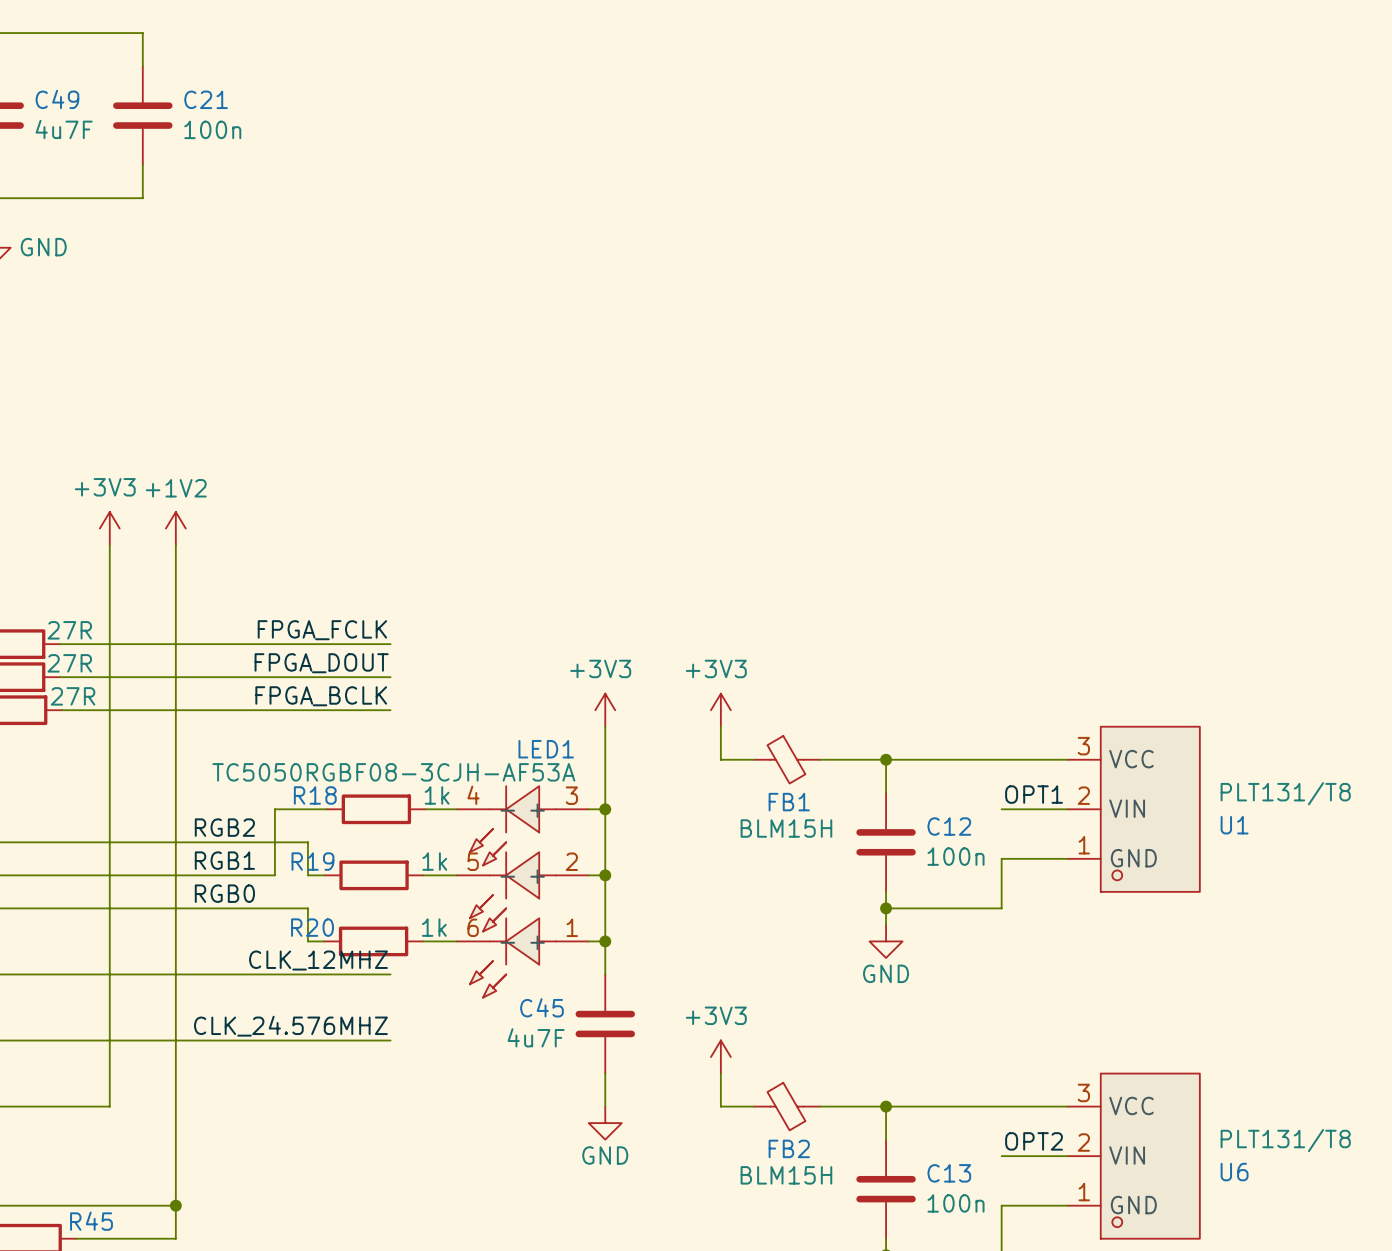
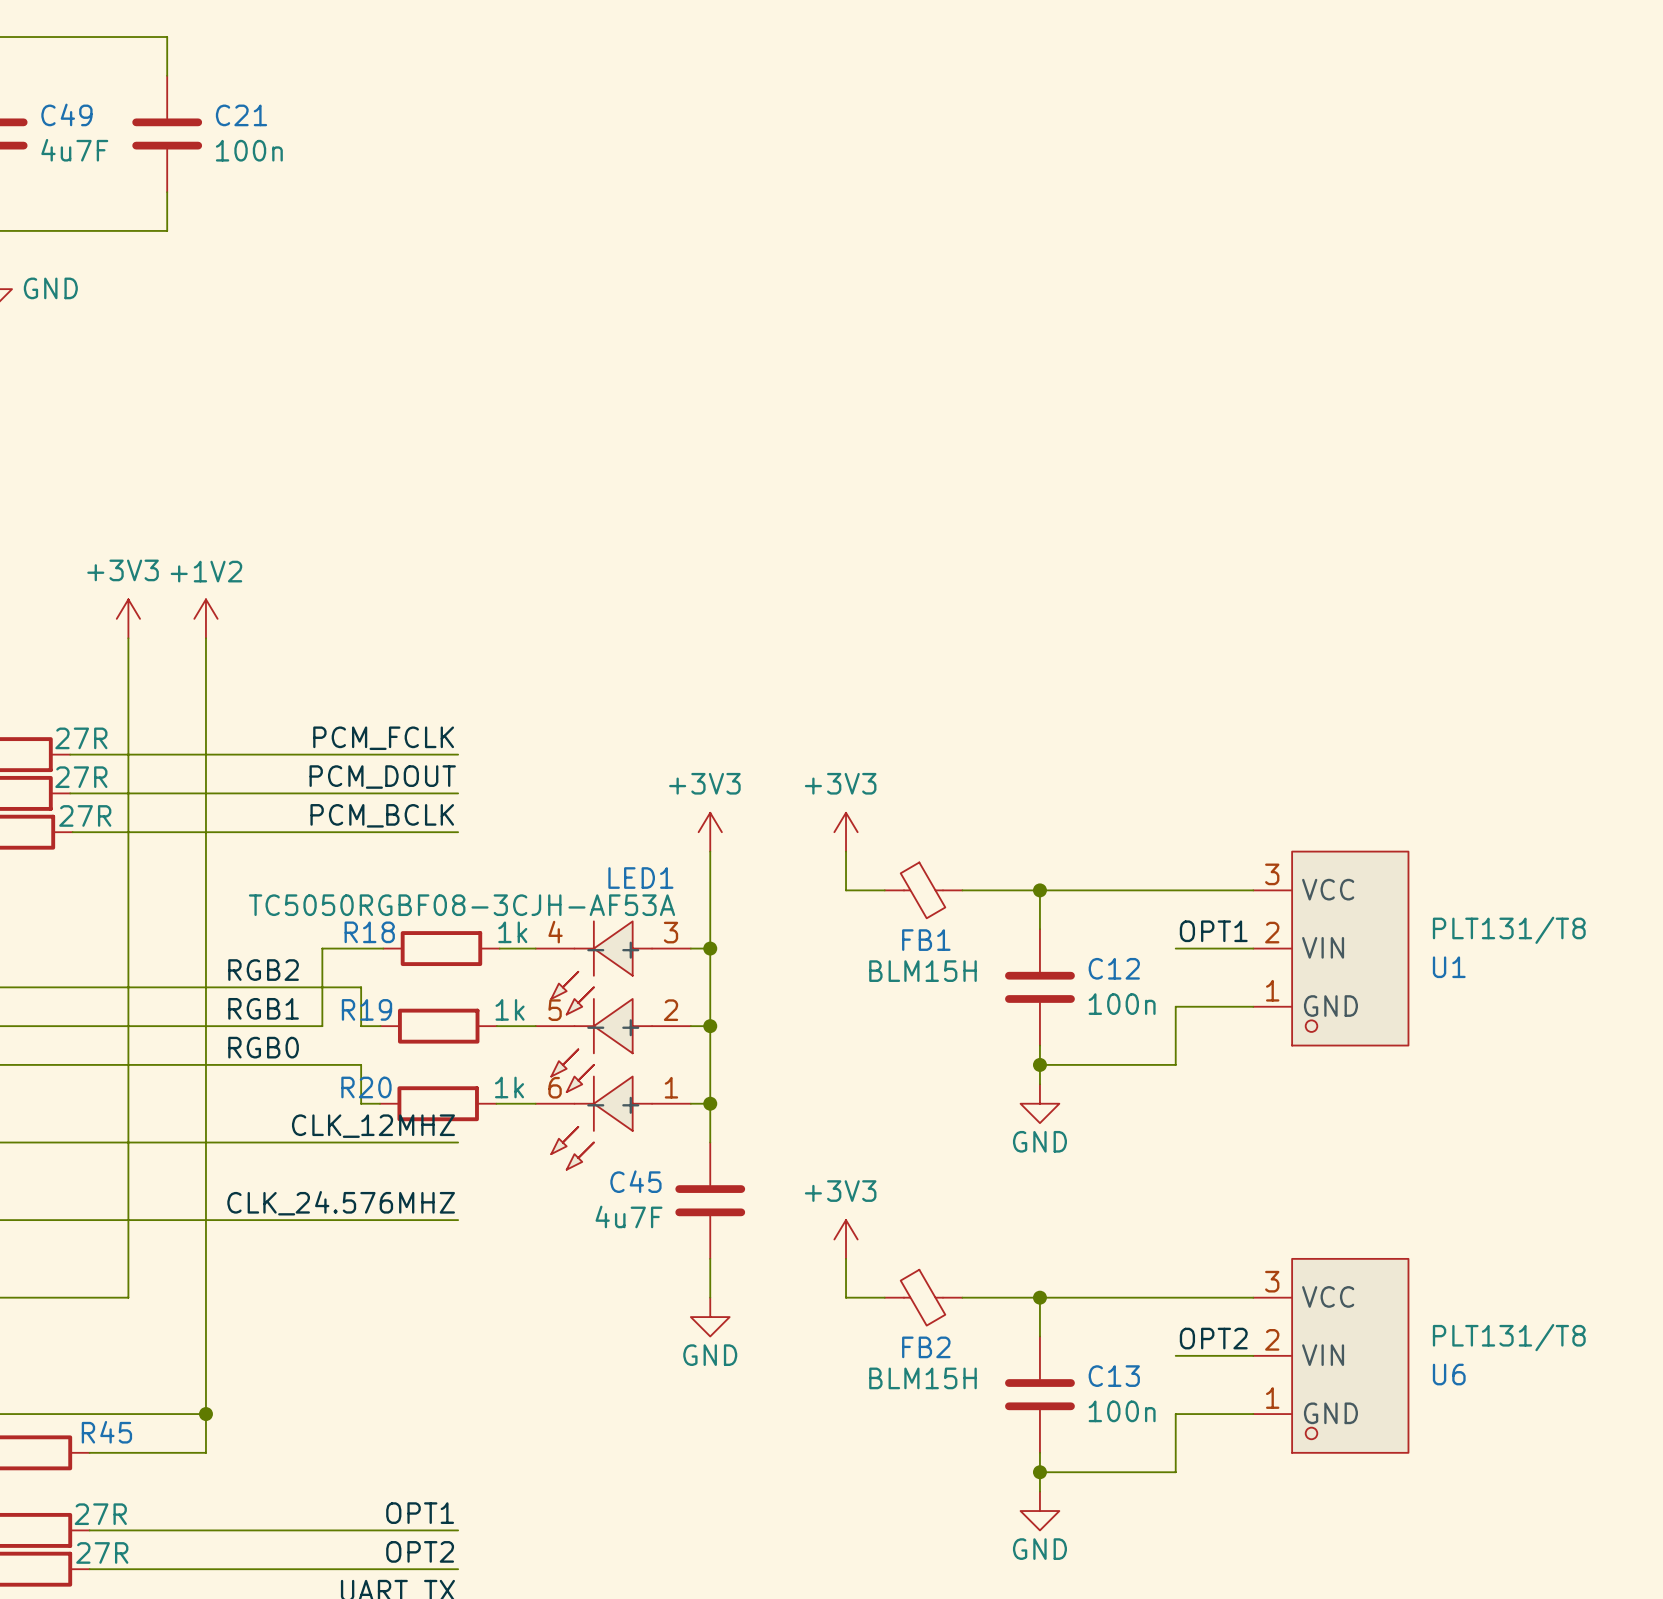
label: FPGA_FCLK (322, 630) -> PCM_FCLK (383, 738)
label: FPGA_DOUT (321, 663) -> PCM_DOUT (382, 777)
label: FPGA_BCLK (321, 696) -> PCM_BCLK (382, 815)

